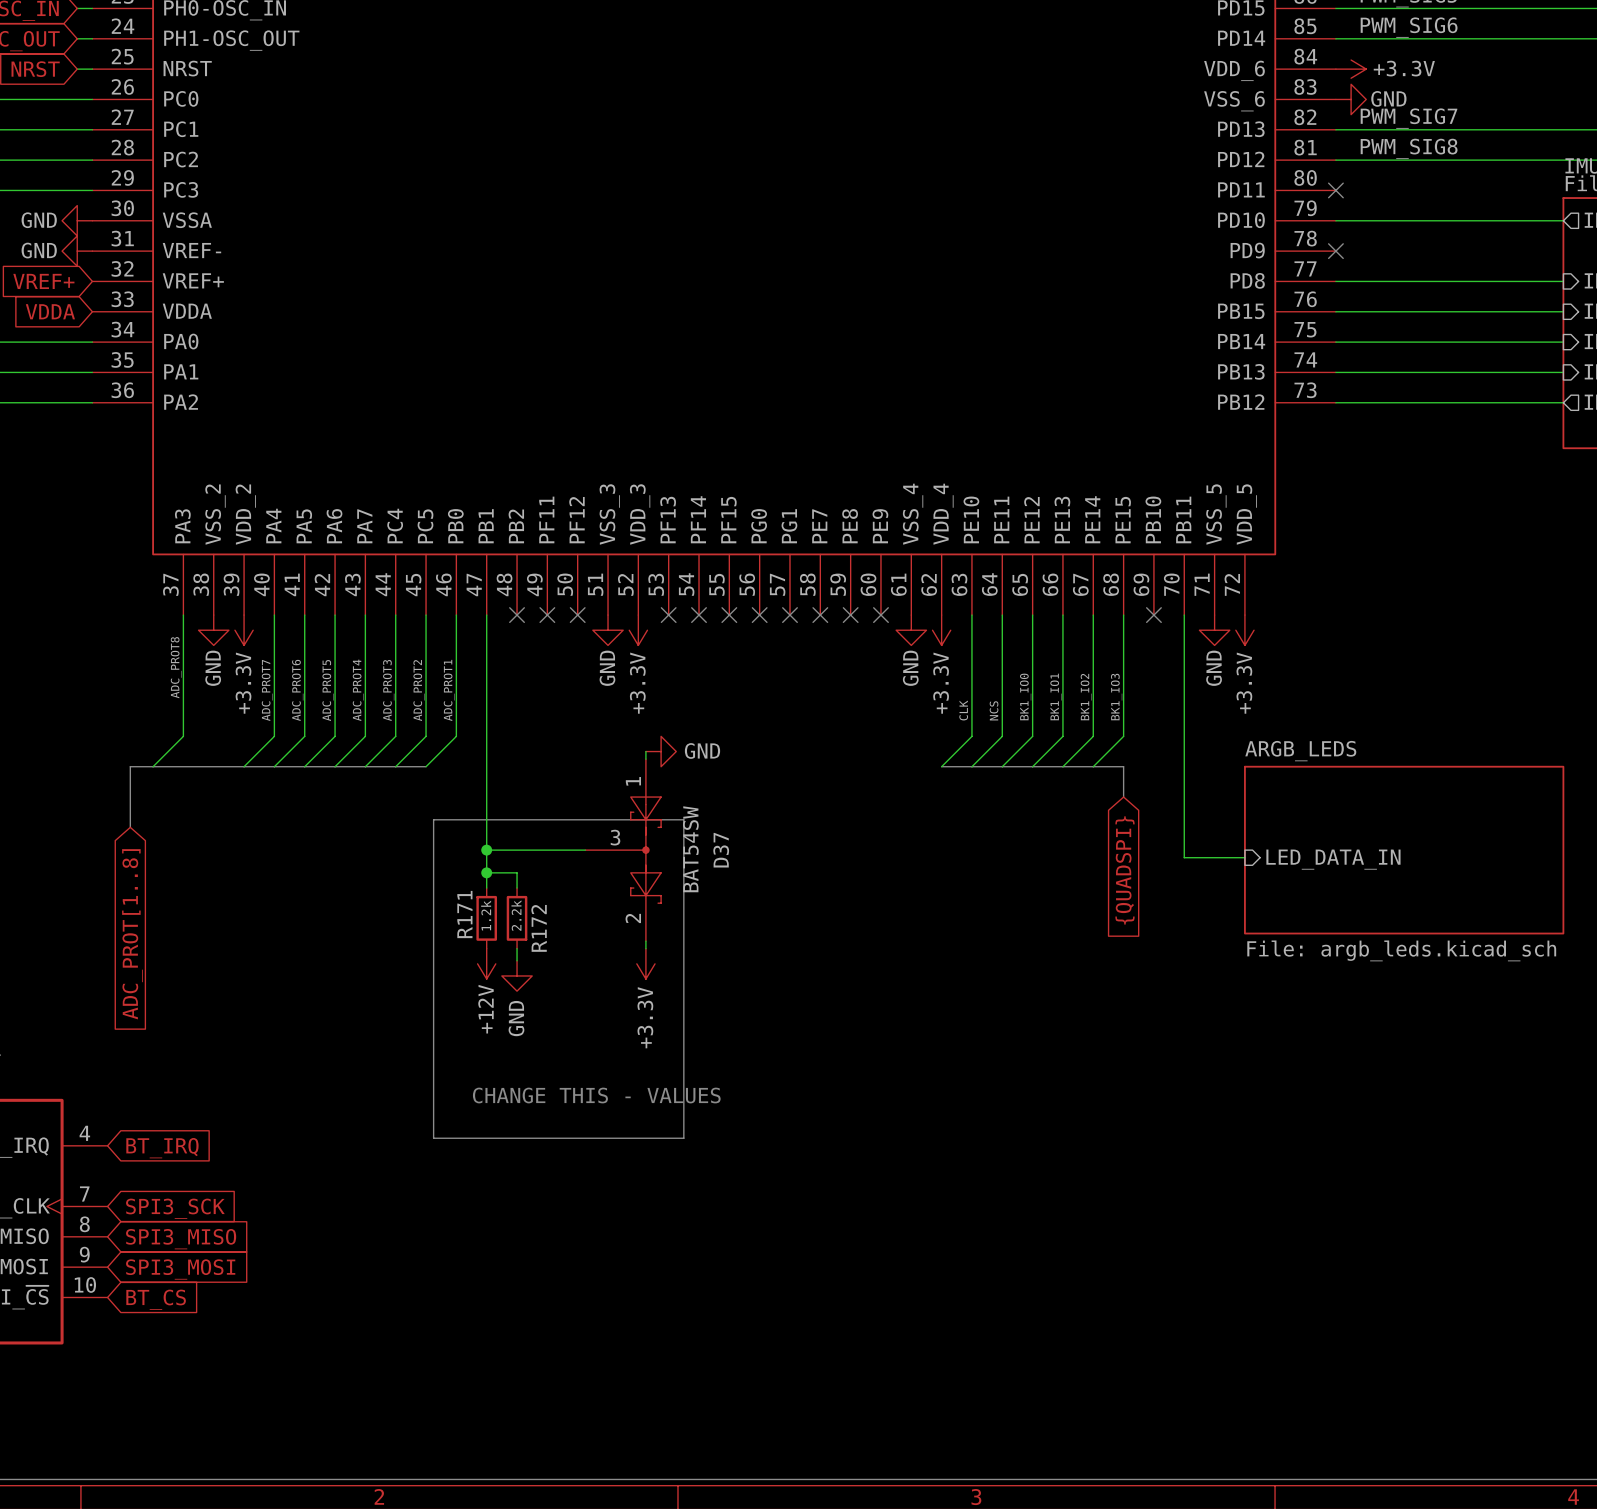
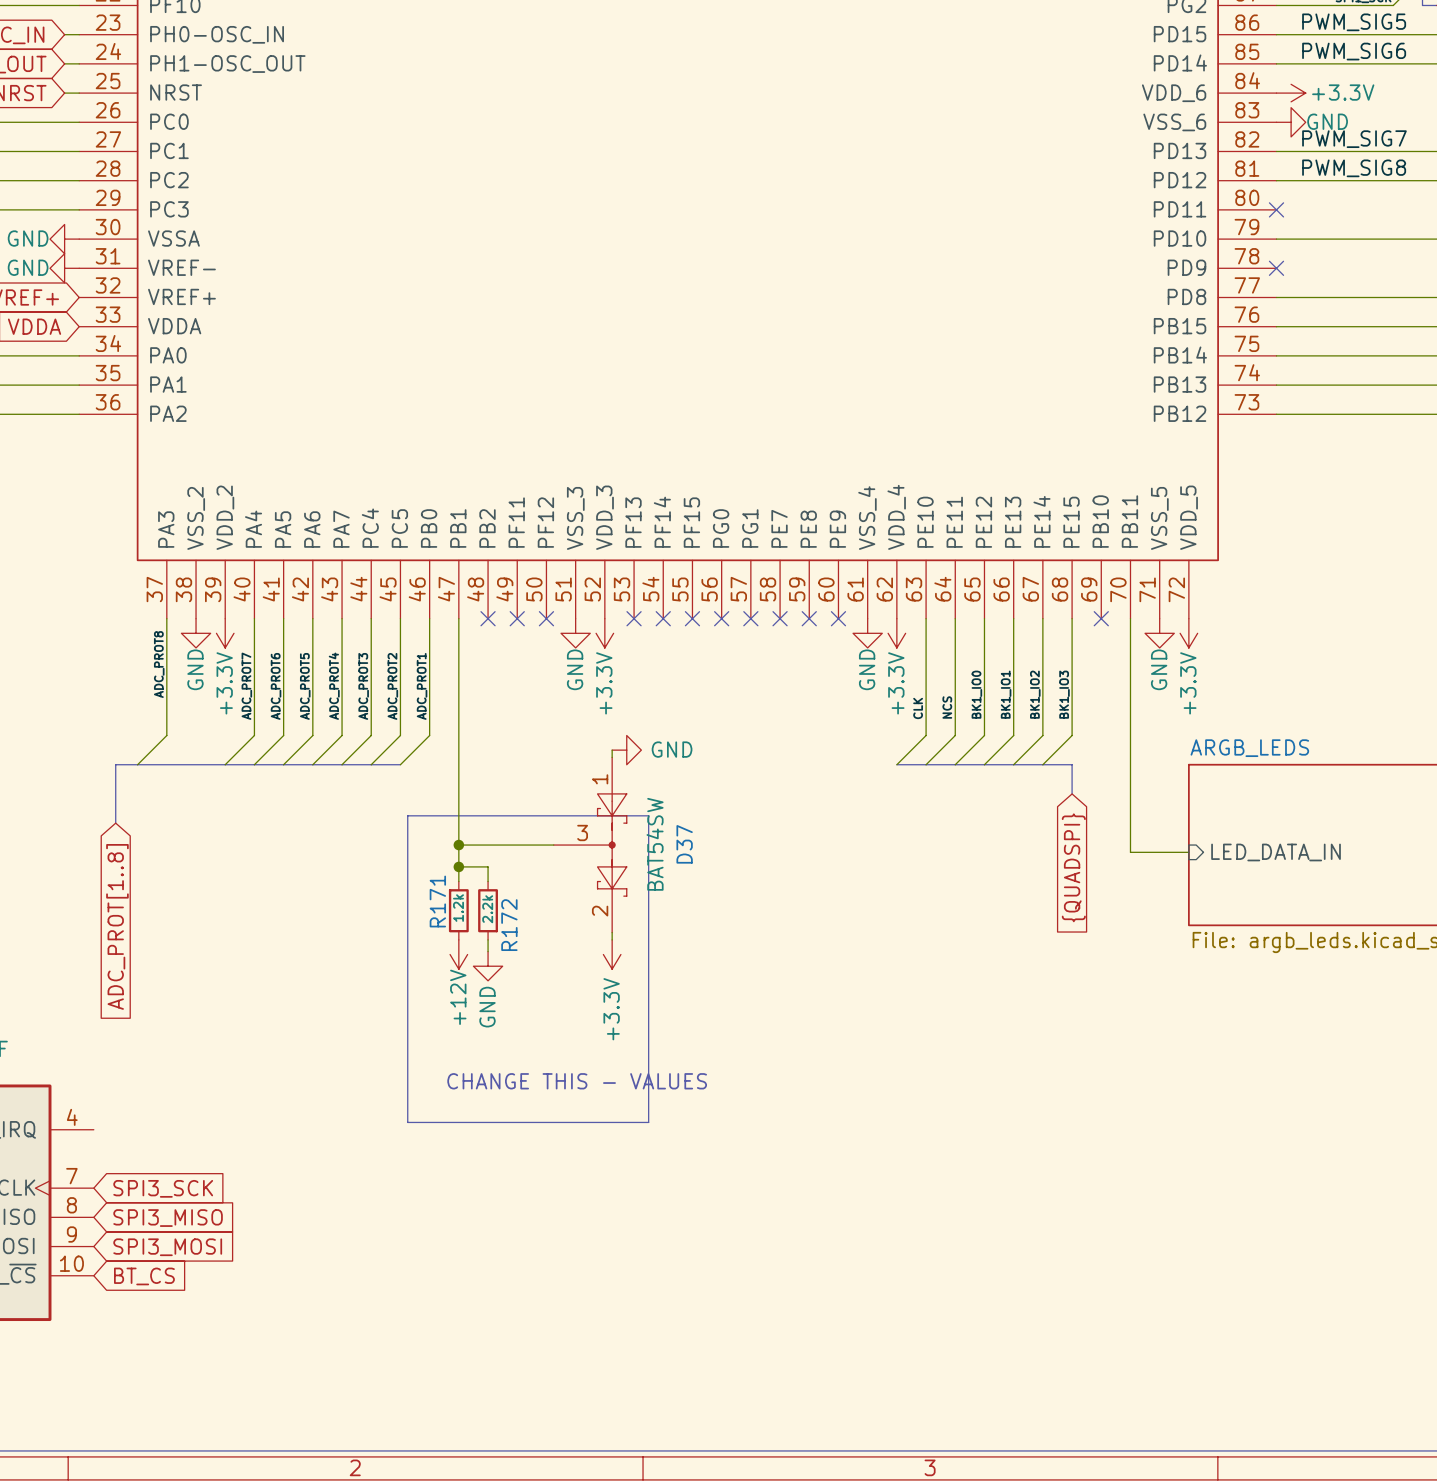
global label: BT_IRQ (162, 1148) -> none

